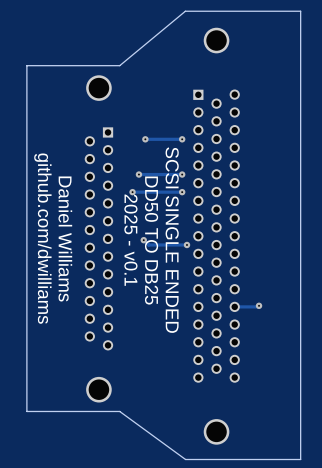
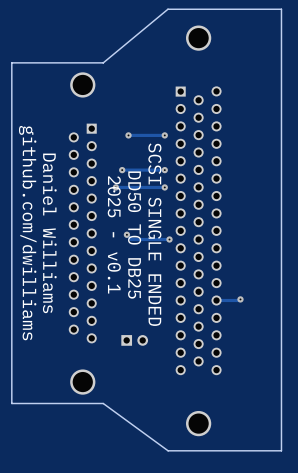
part: none -> (134, 340)

